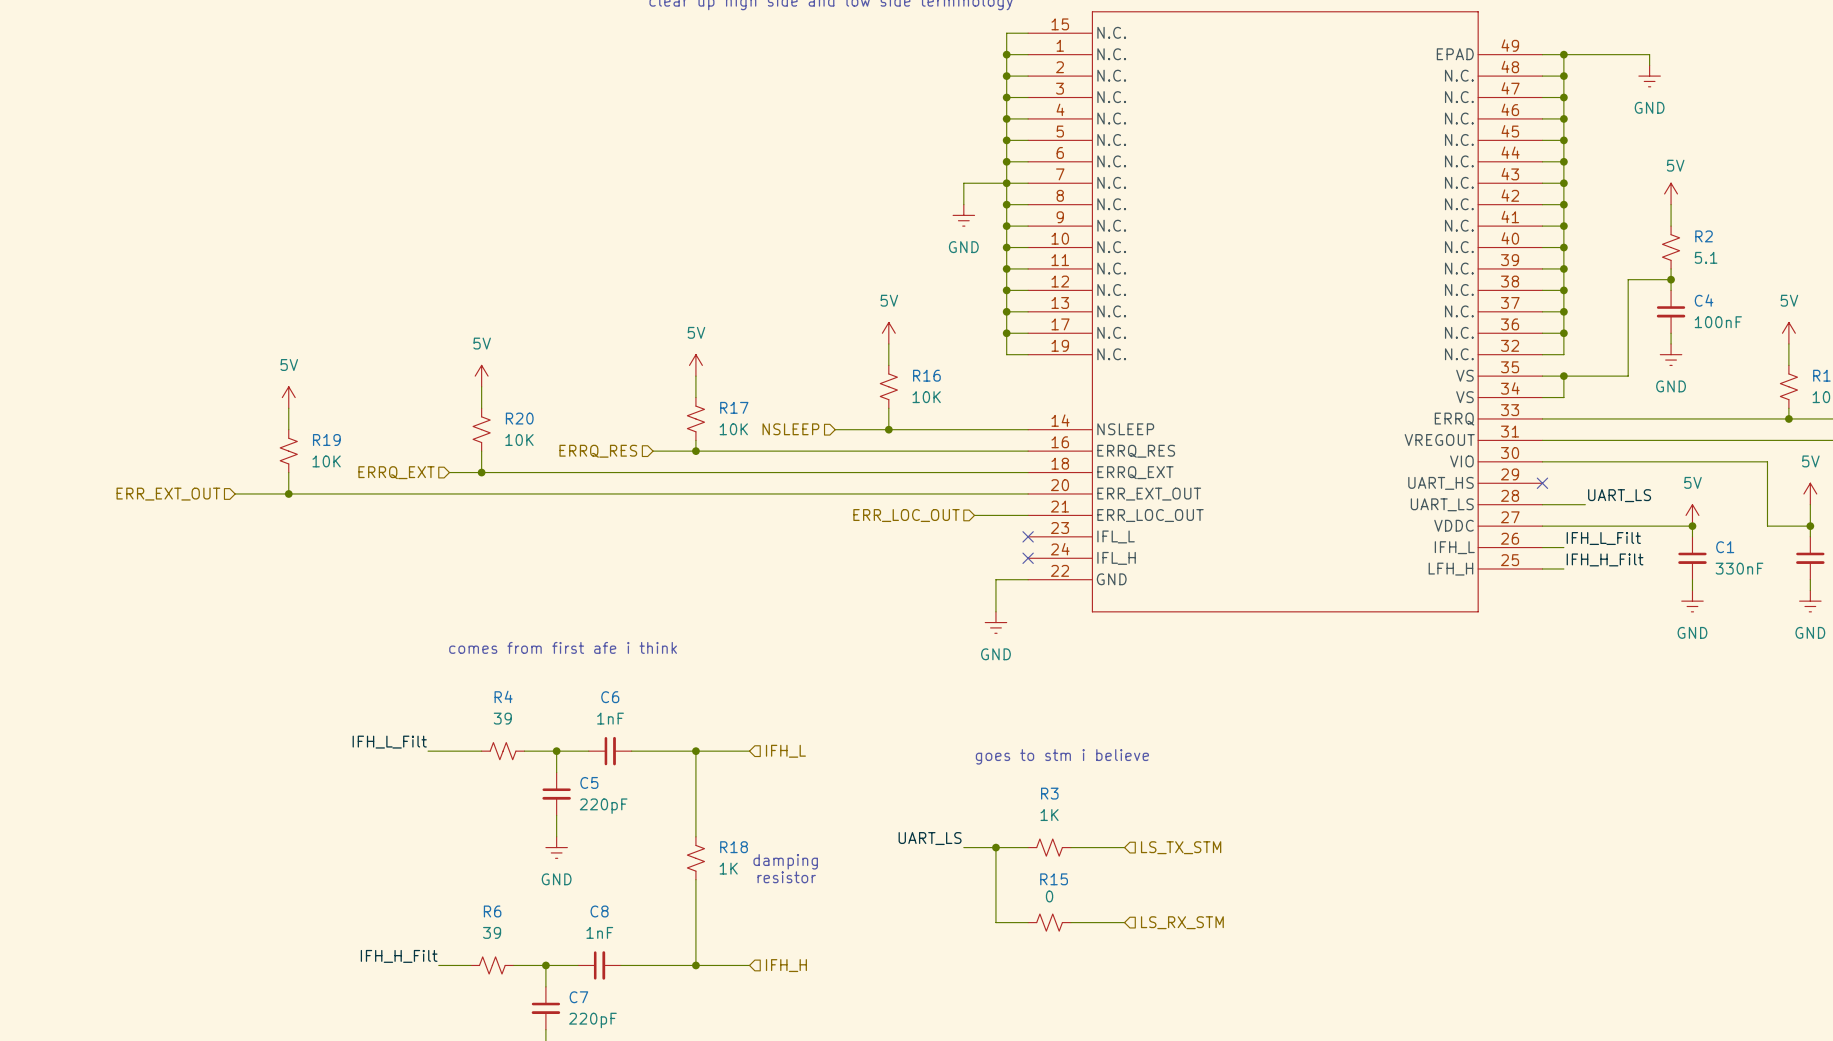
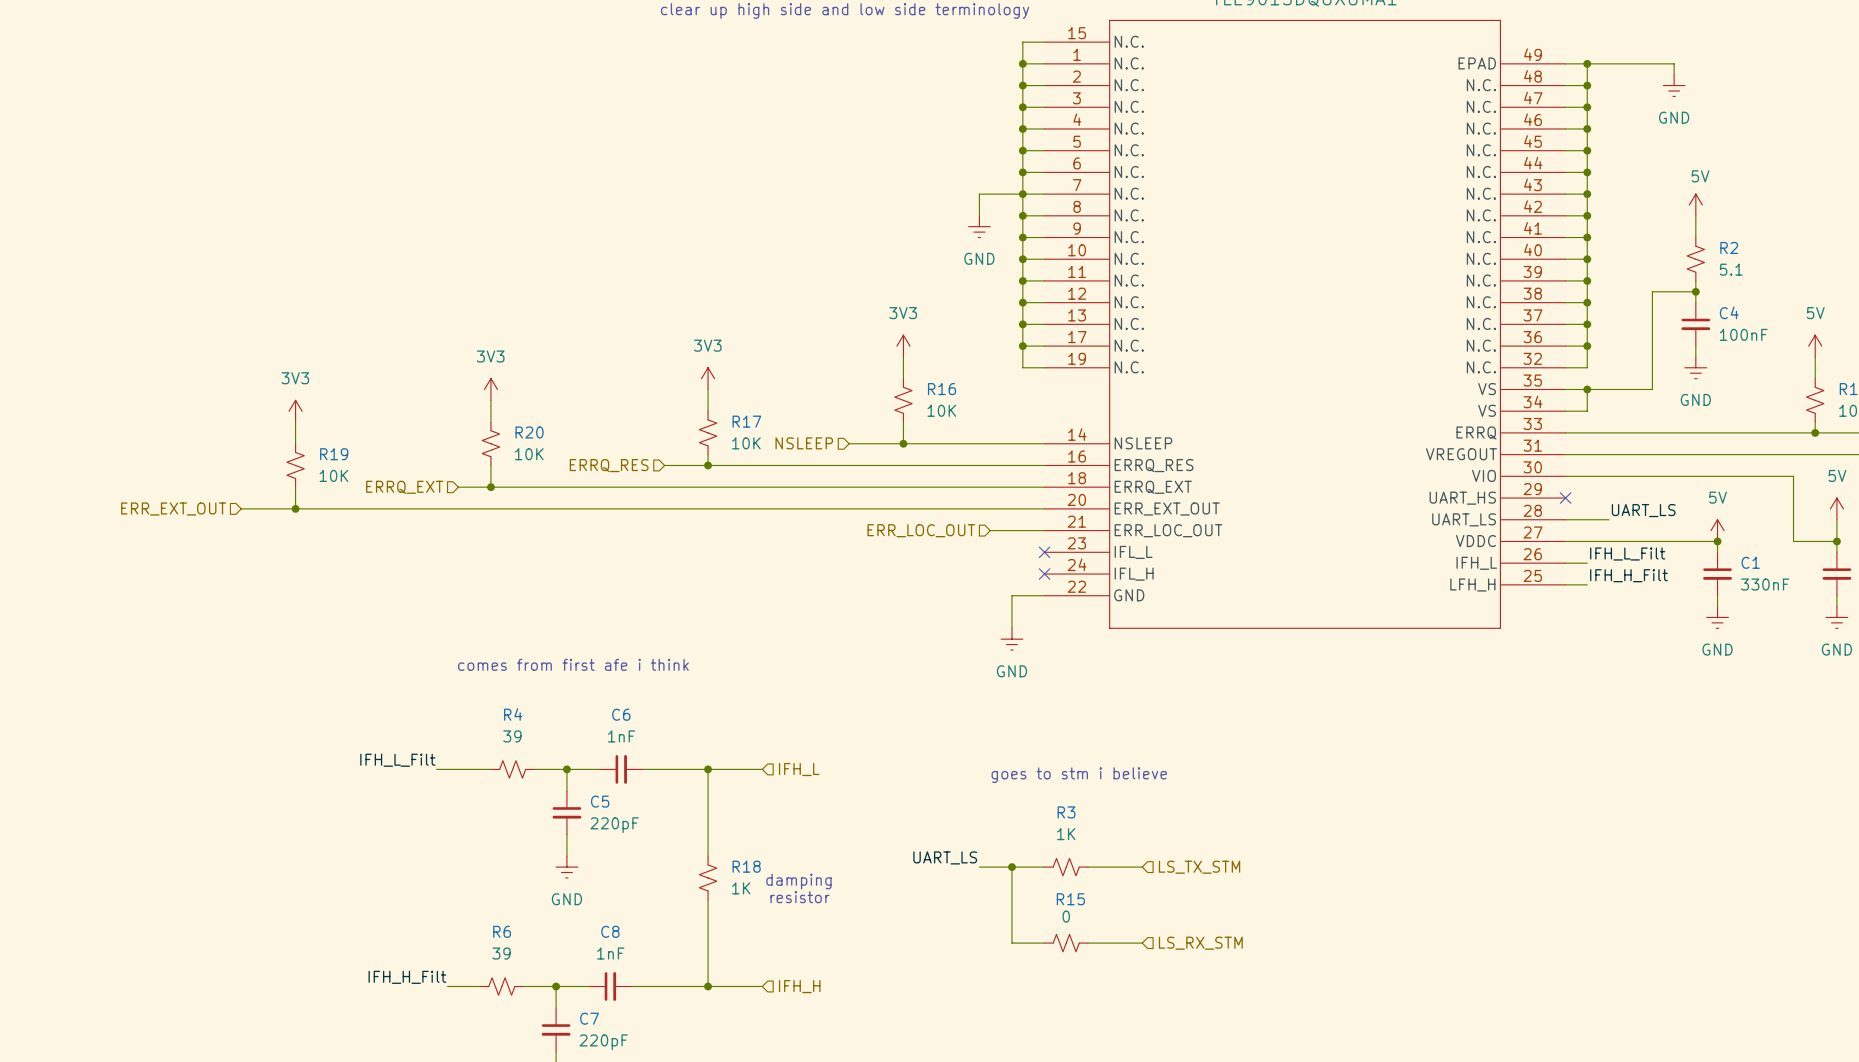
power symbol: 5V (888, 333) -> 3V3 (903, 346)
power symbol: 5V (695, 365) -> 3V3 (708, 378)
power symbol: 5V (481, 376) -> 3V3 (490, 389)
power symbol: 5V (288, 397) -> 3V3 (295, 411)

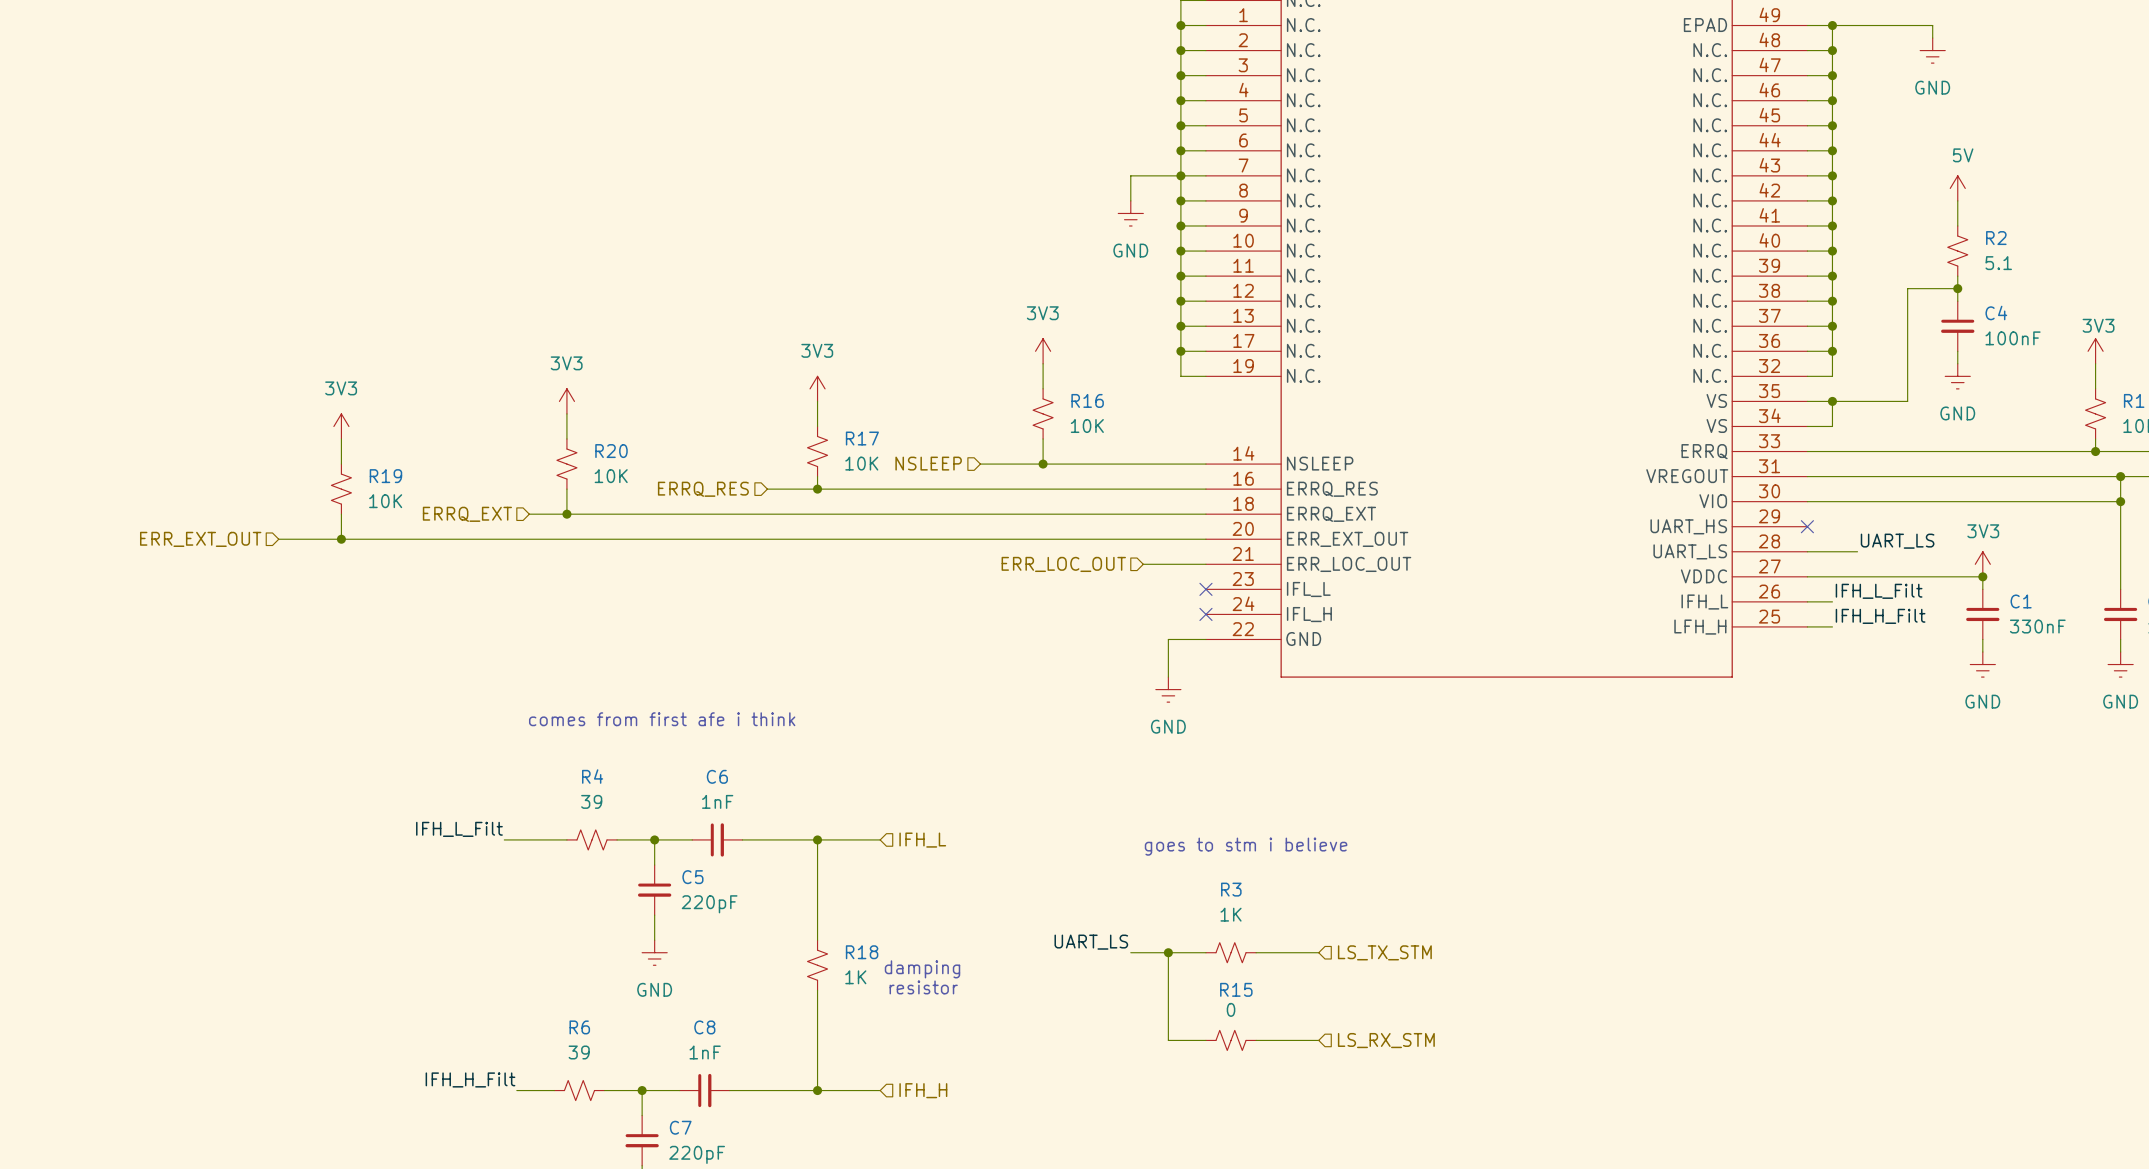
power symbol: 5V (1815, 346) -> 3V3 (2095, 351)
wire: none -> (2120, 476) (2120, 551)
junction: none -> (2120, 476)
wire: (1793, 476) (1793, 541) (1836, 541) -> (2070, 501) (2120, 501)
junction: none -> (2120, 501)
power symbol: 5V (1836, 508) -> none
power symbol: 5V (1717, 530) -> 3V3 (1982, 564)
junction: (1836, 541) -> none

